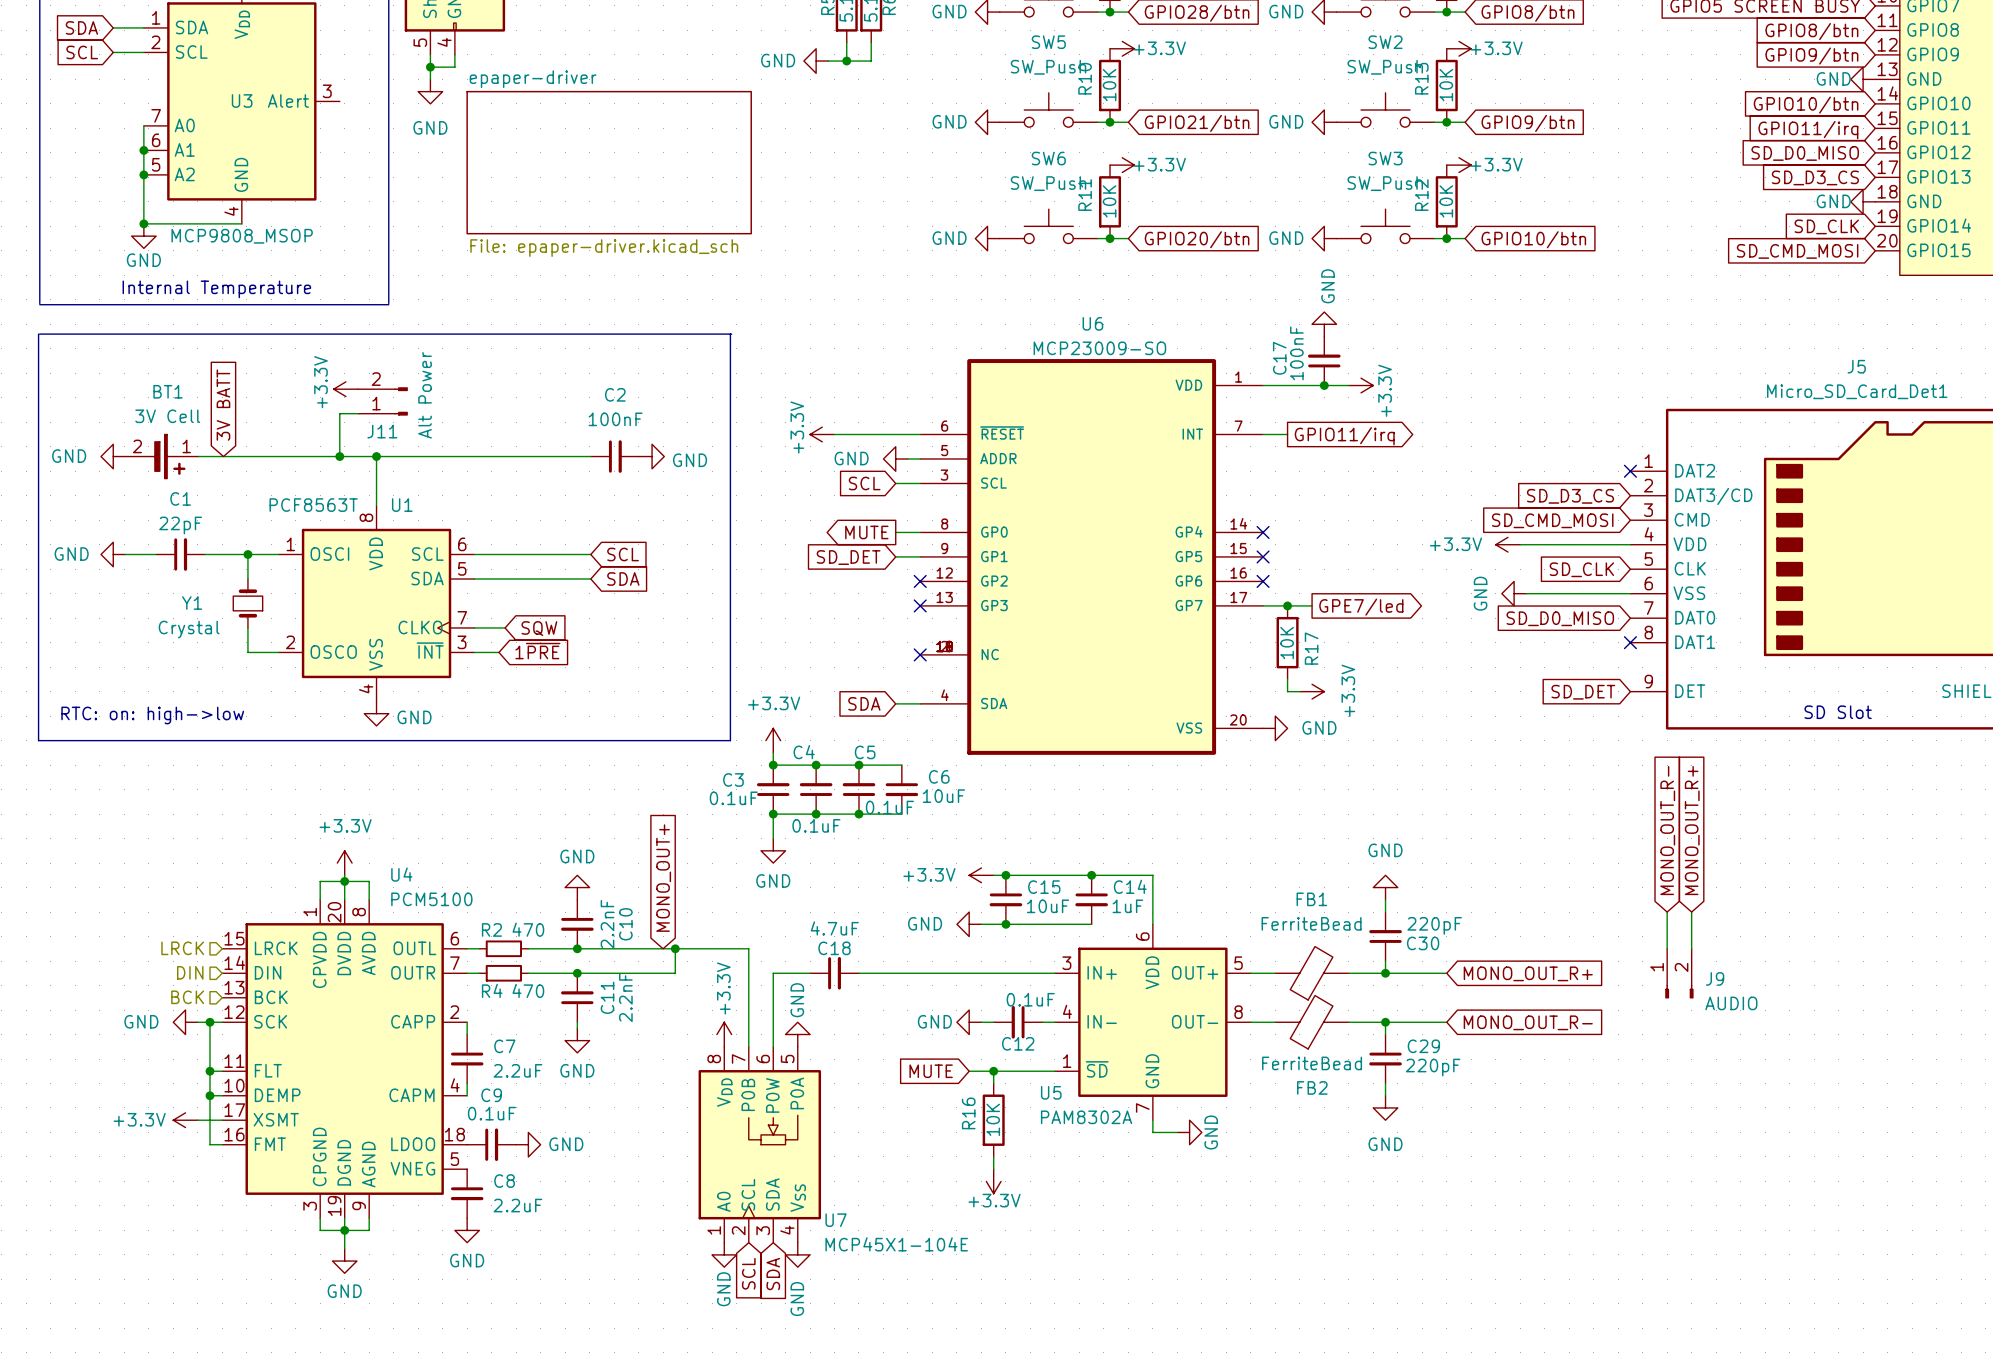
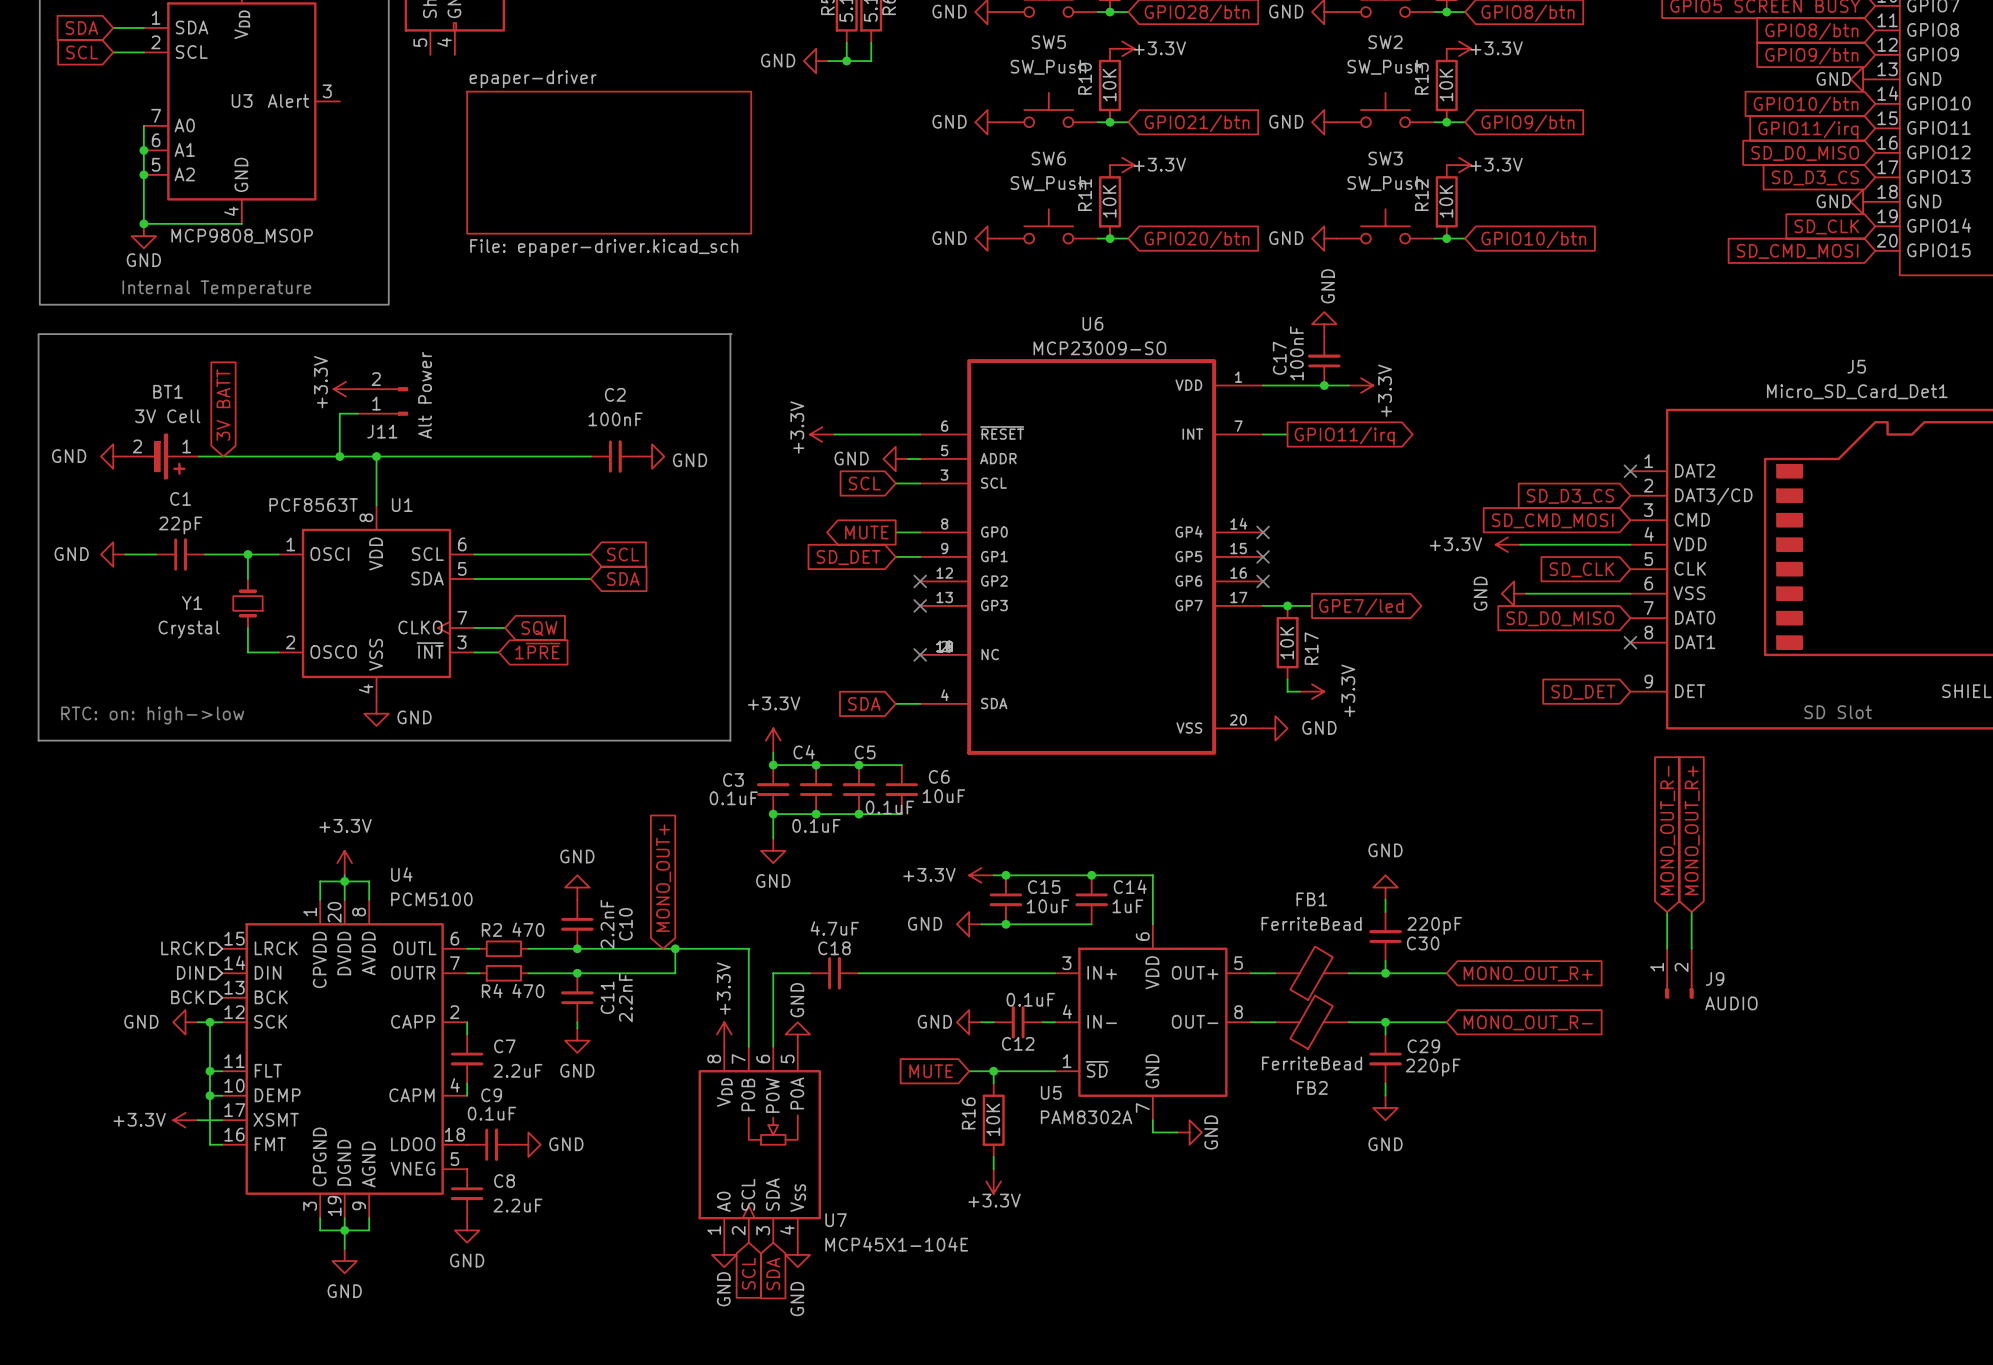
wire: (430, 54) (430, 79) -> none
wire: (454, 54) (454, 67) (430, 67) -> none
junction: (430, 67) -> none
power symbol: GND (430, 91) -> none

